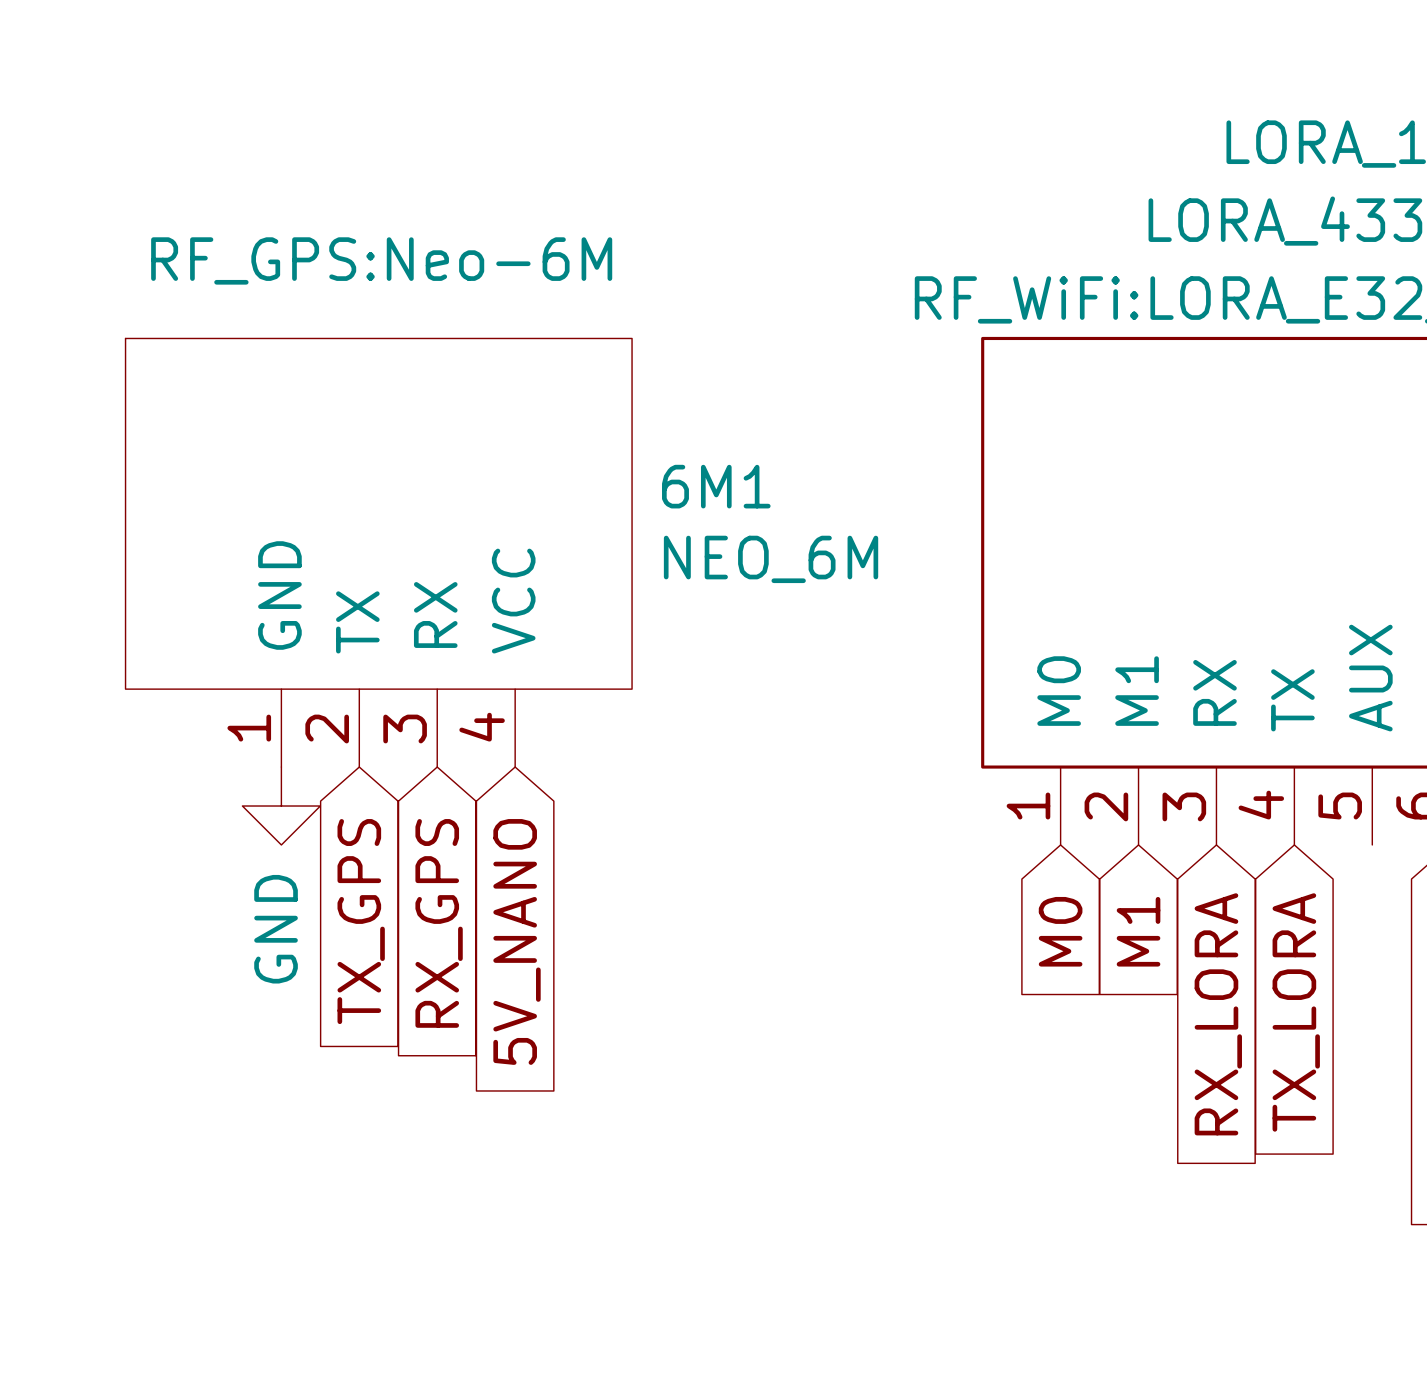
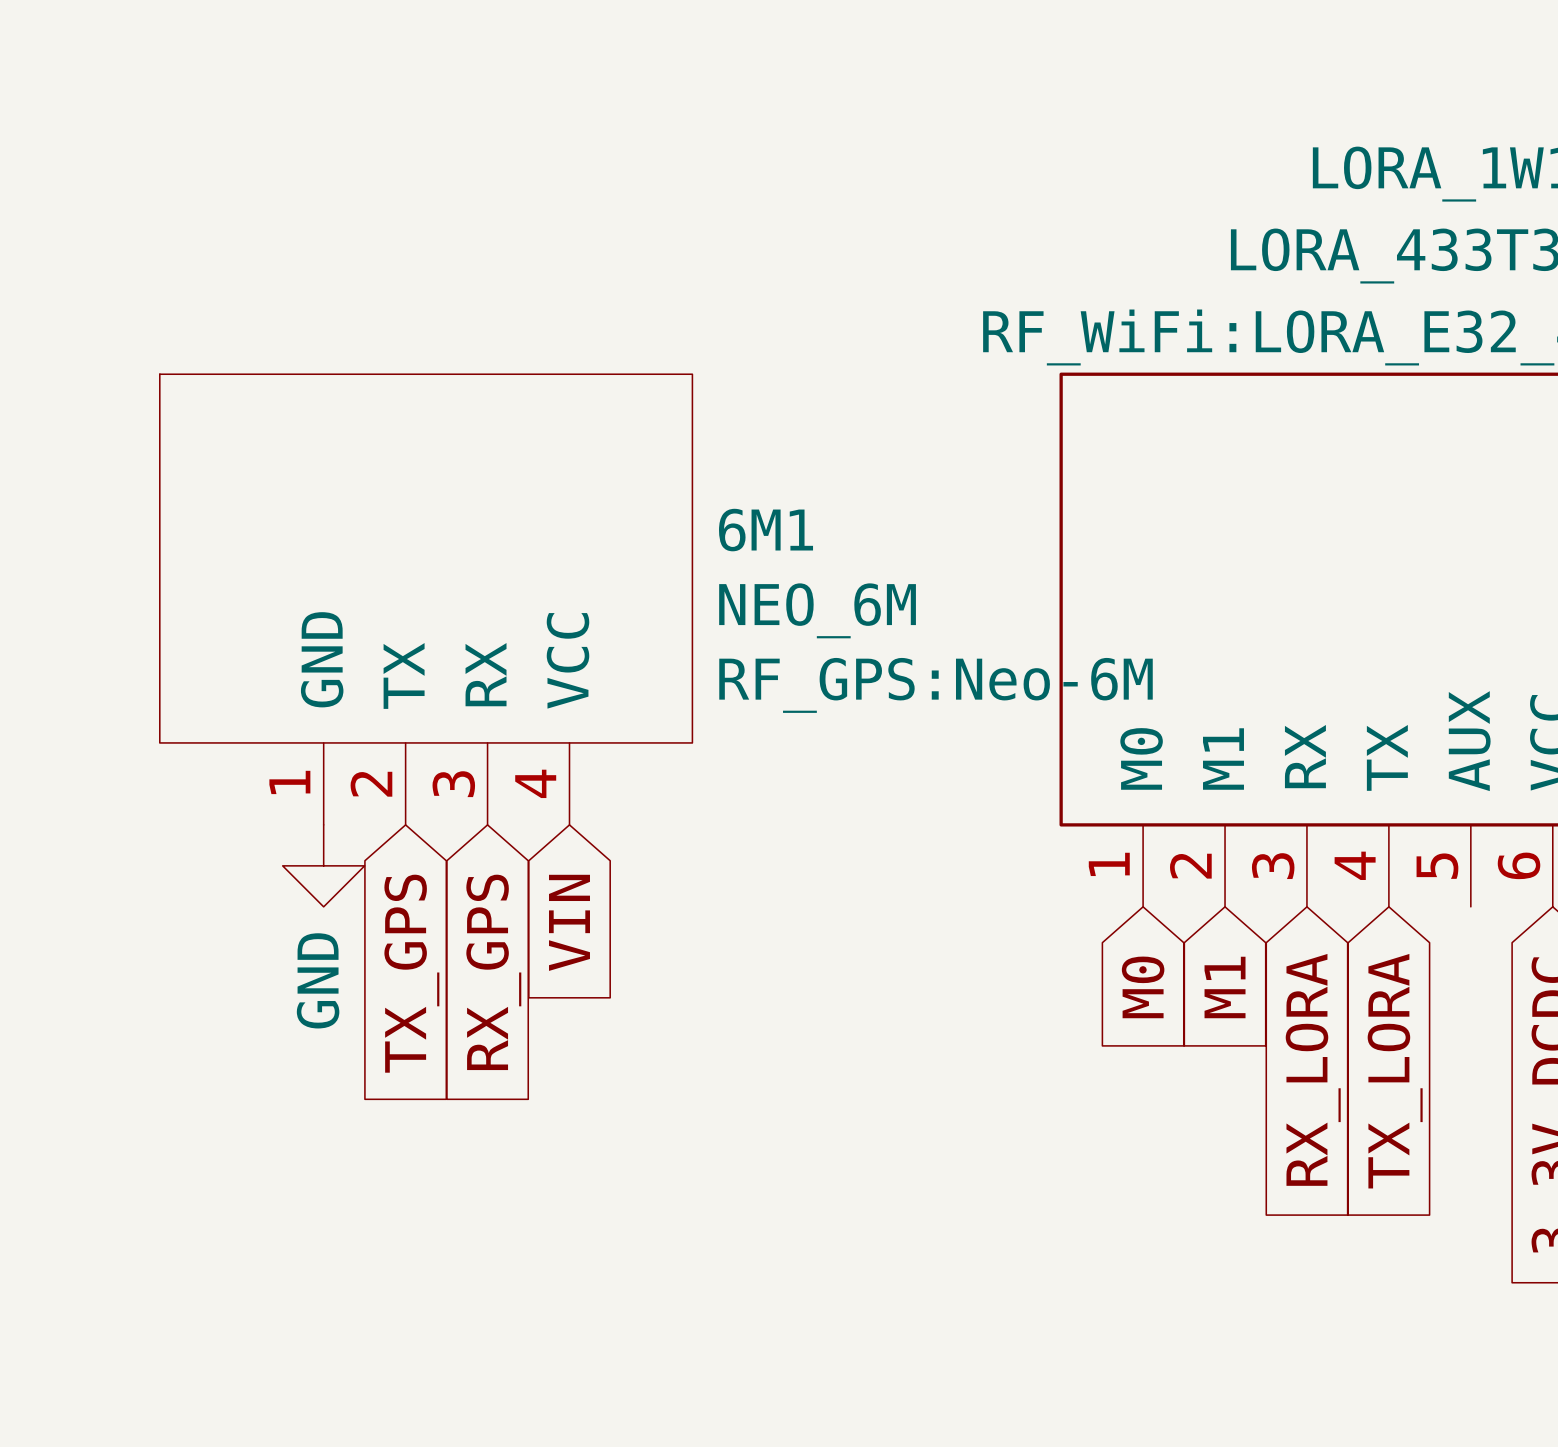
6M1 text position: RF_GPS:Neo-6M (381, 260) -> RF_GPS:Neo-6M (936, 685)
global label: 5V_NANO (517, 941) -> VIN (569, 922)

